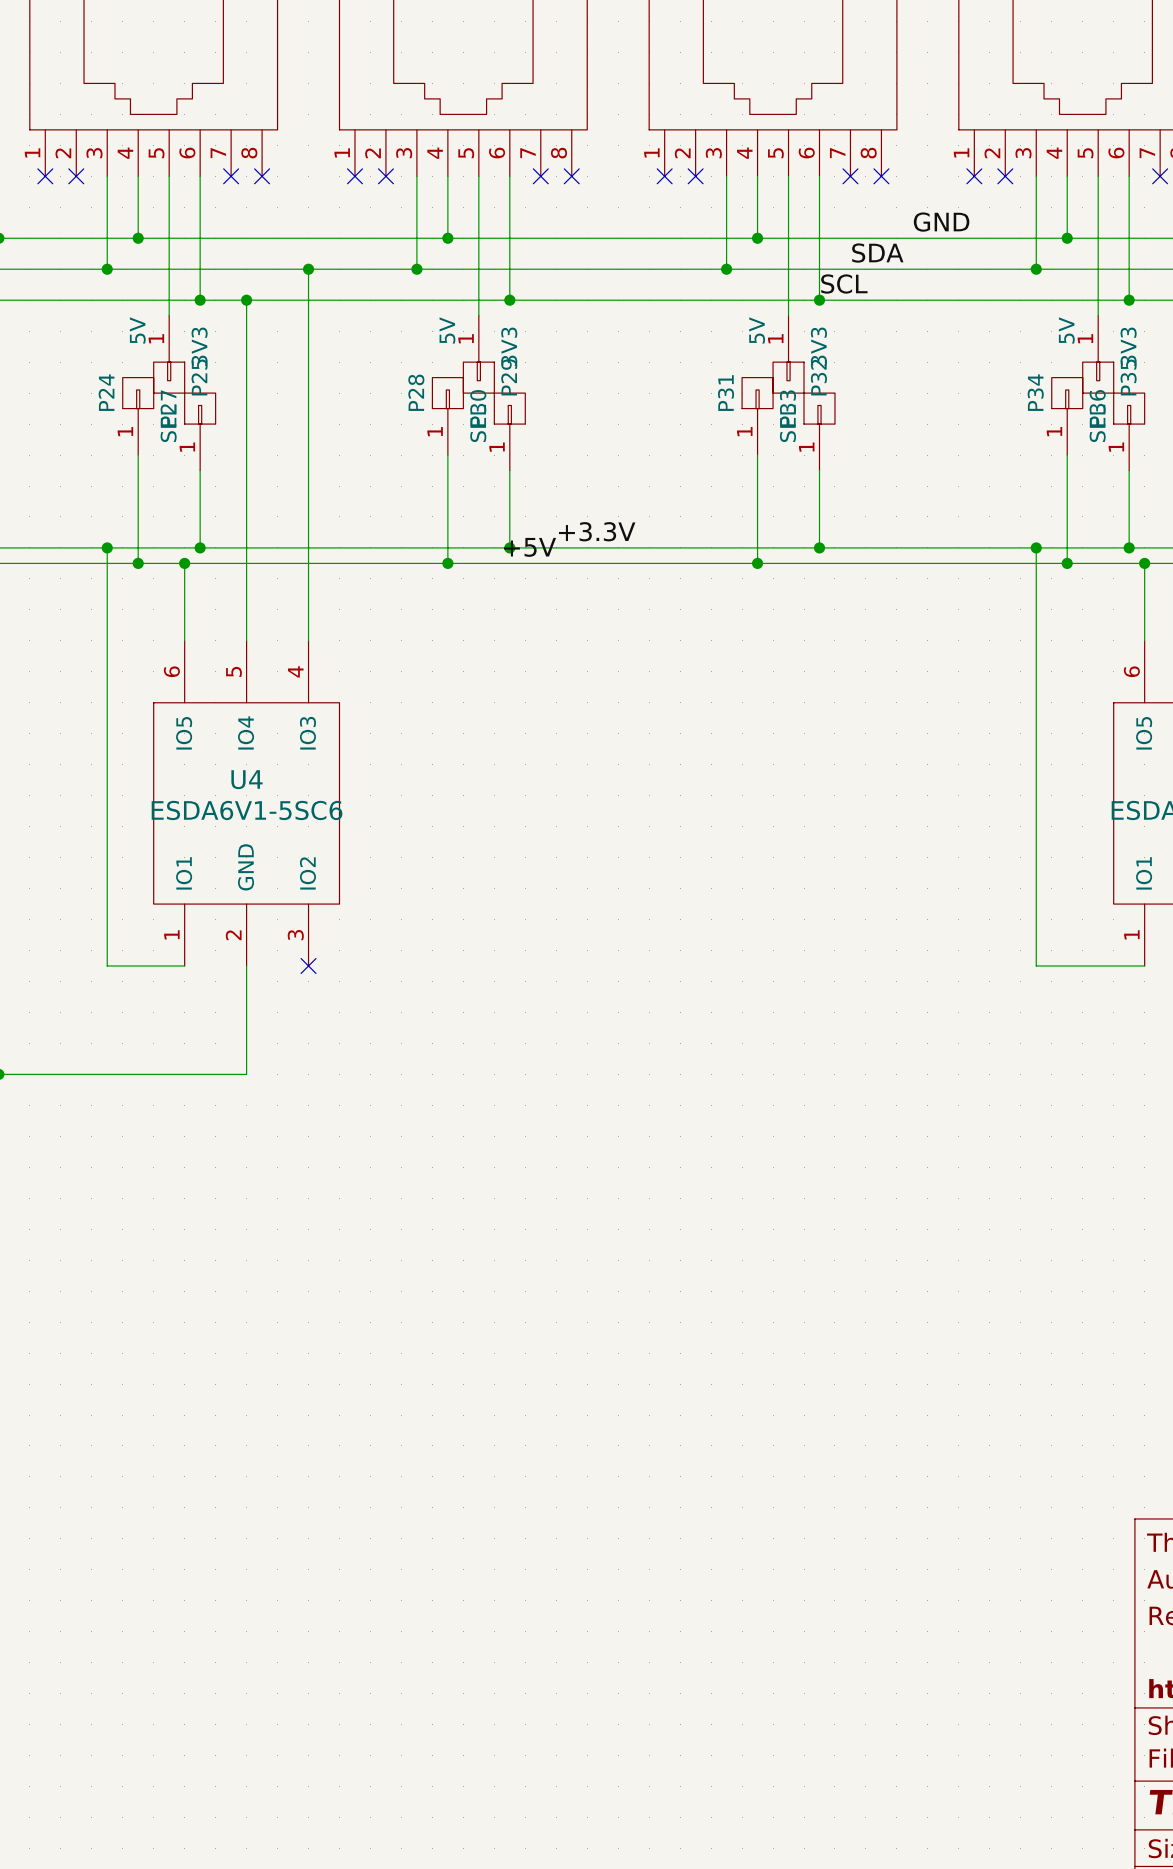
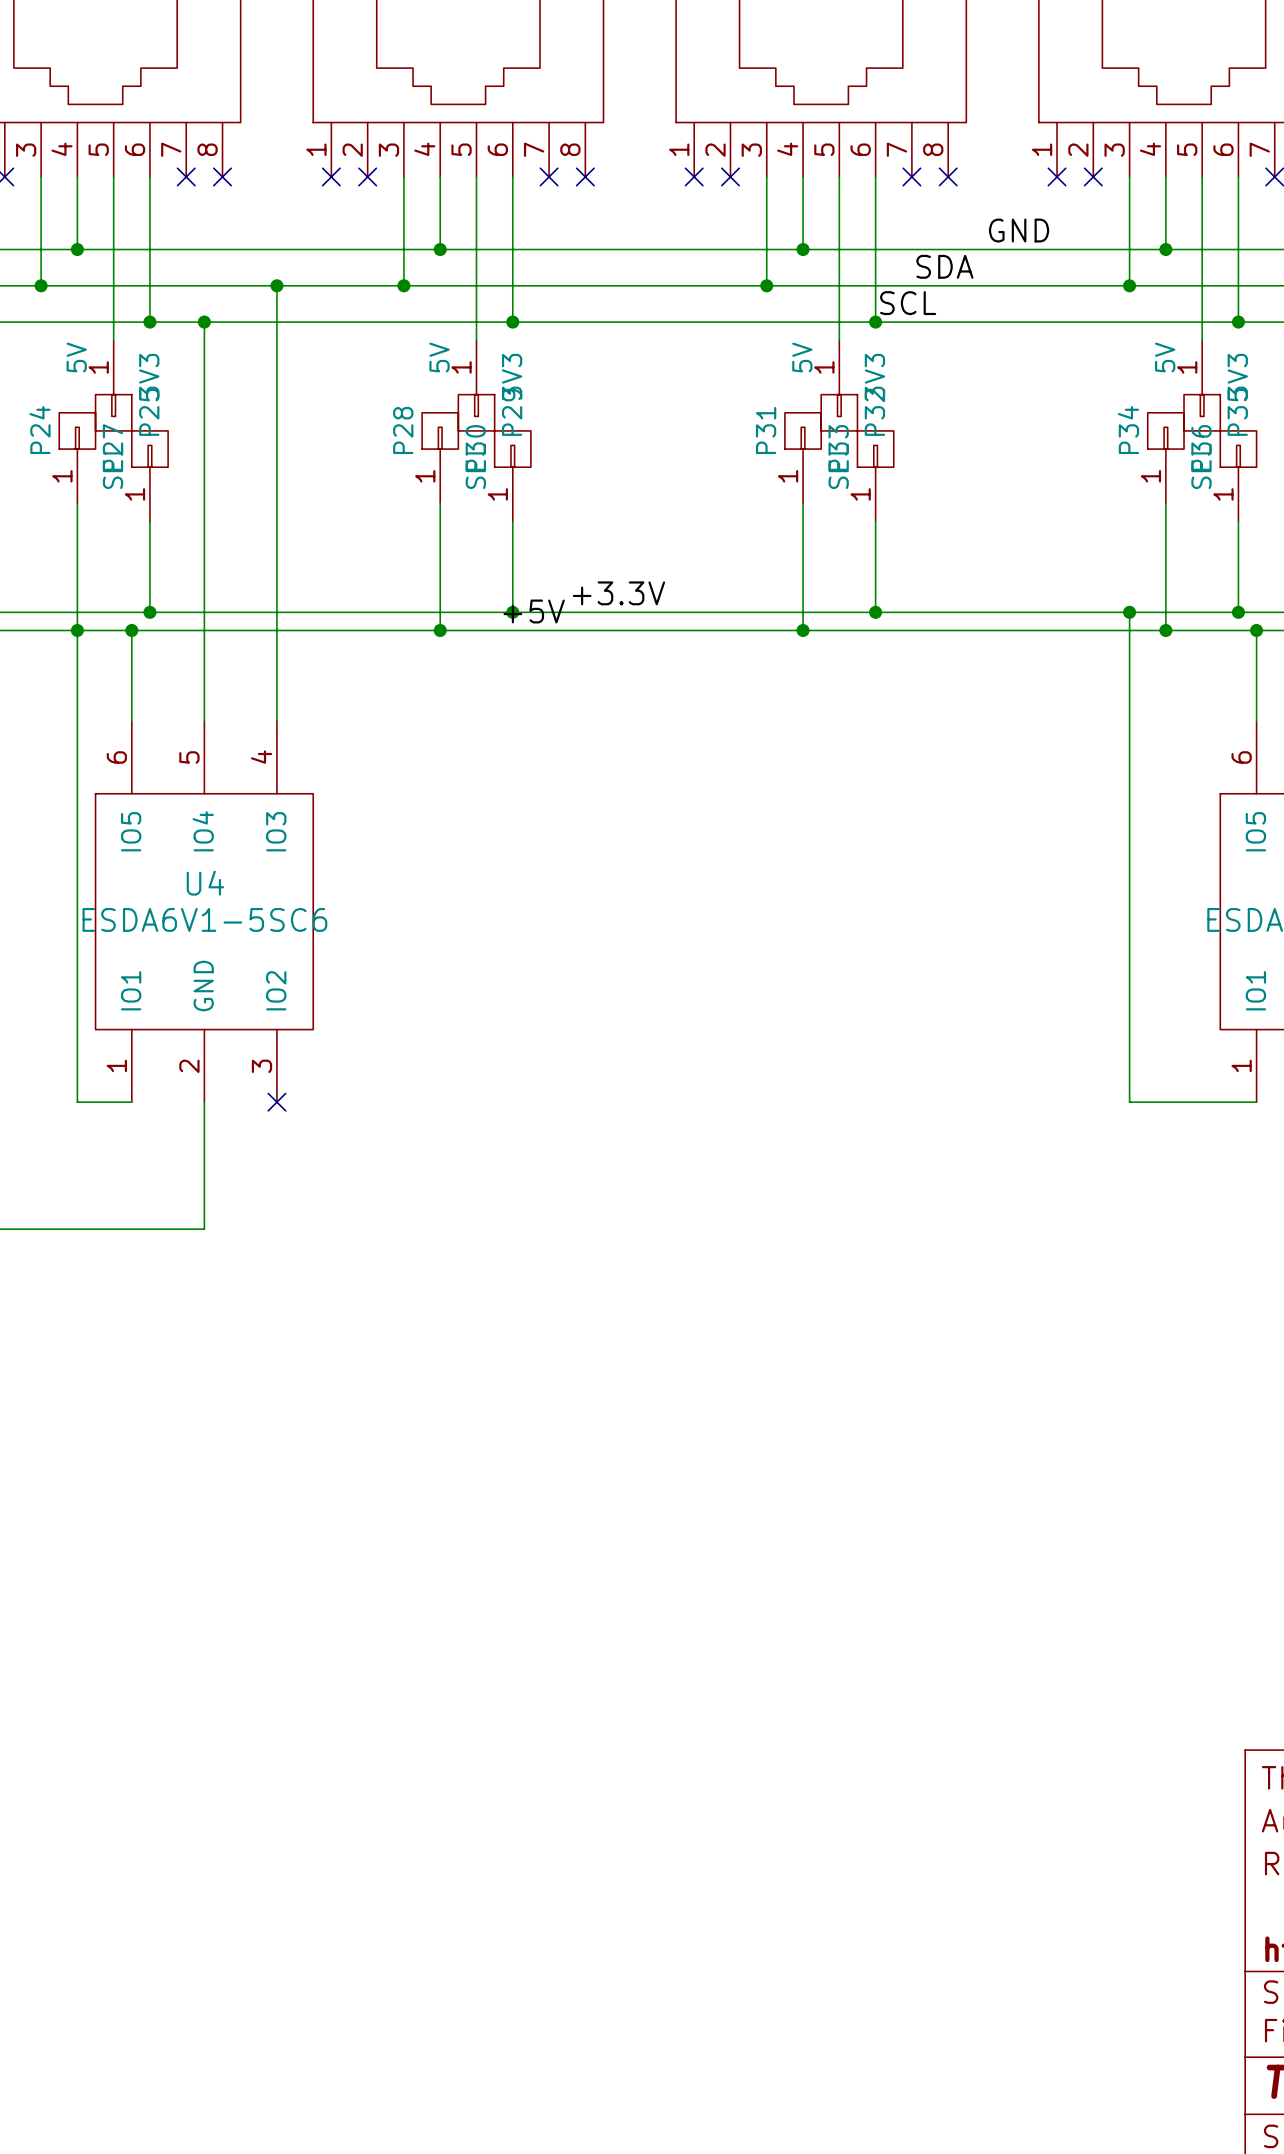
wire: (107, 547) (107, 965) (138, 965) -> (77, 630) (77, 1102)
junction: (107, 547) -> none

